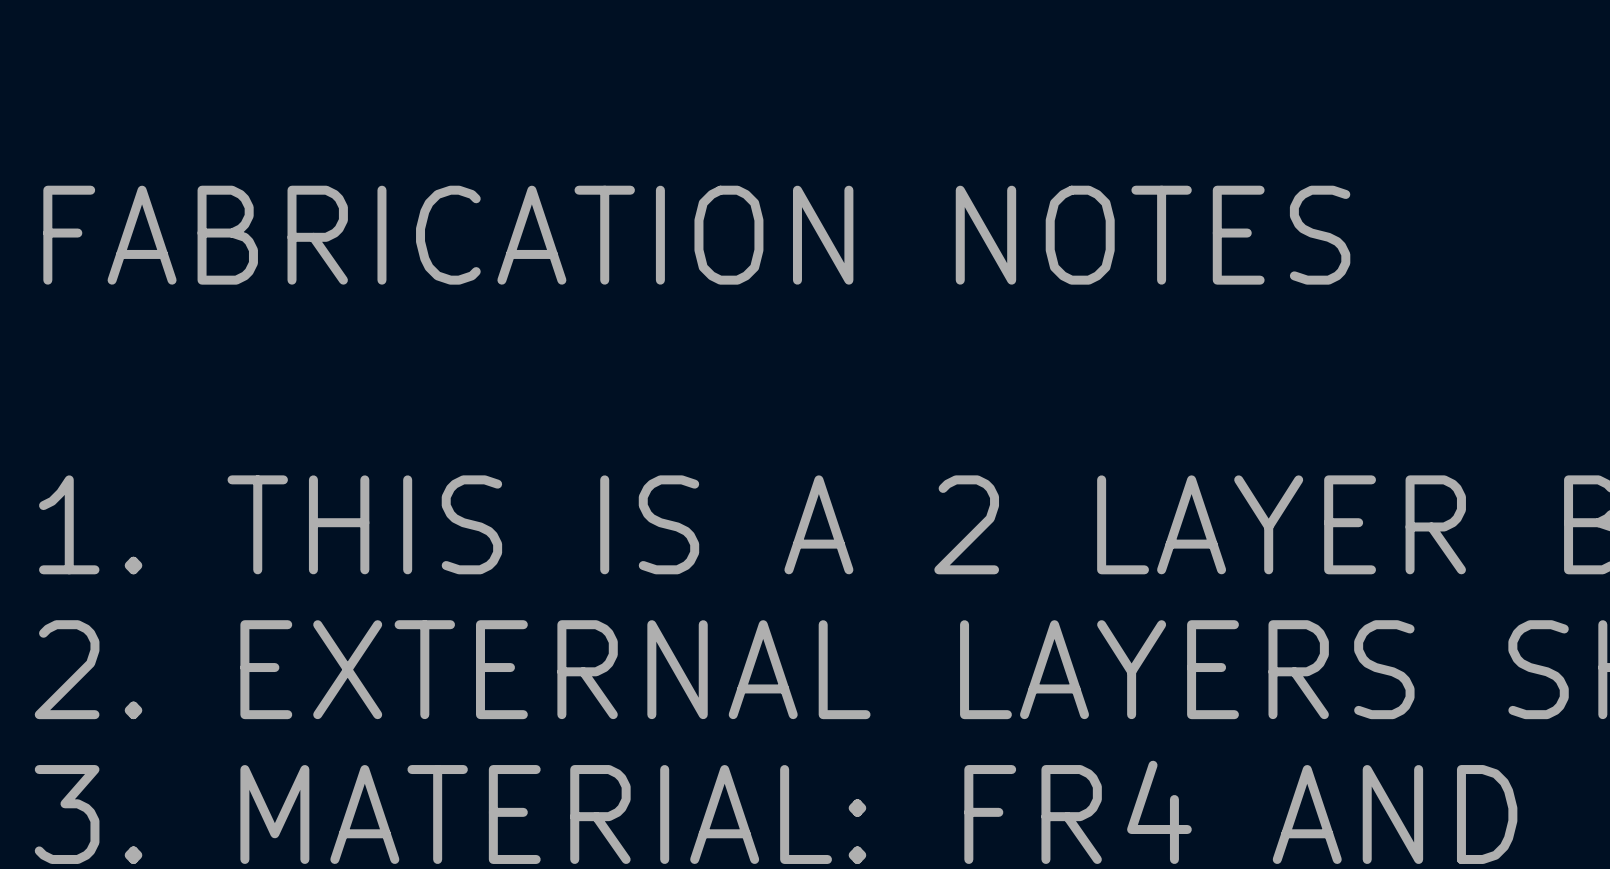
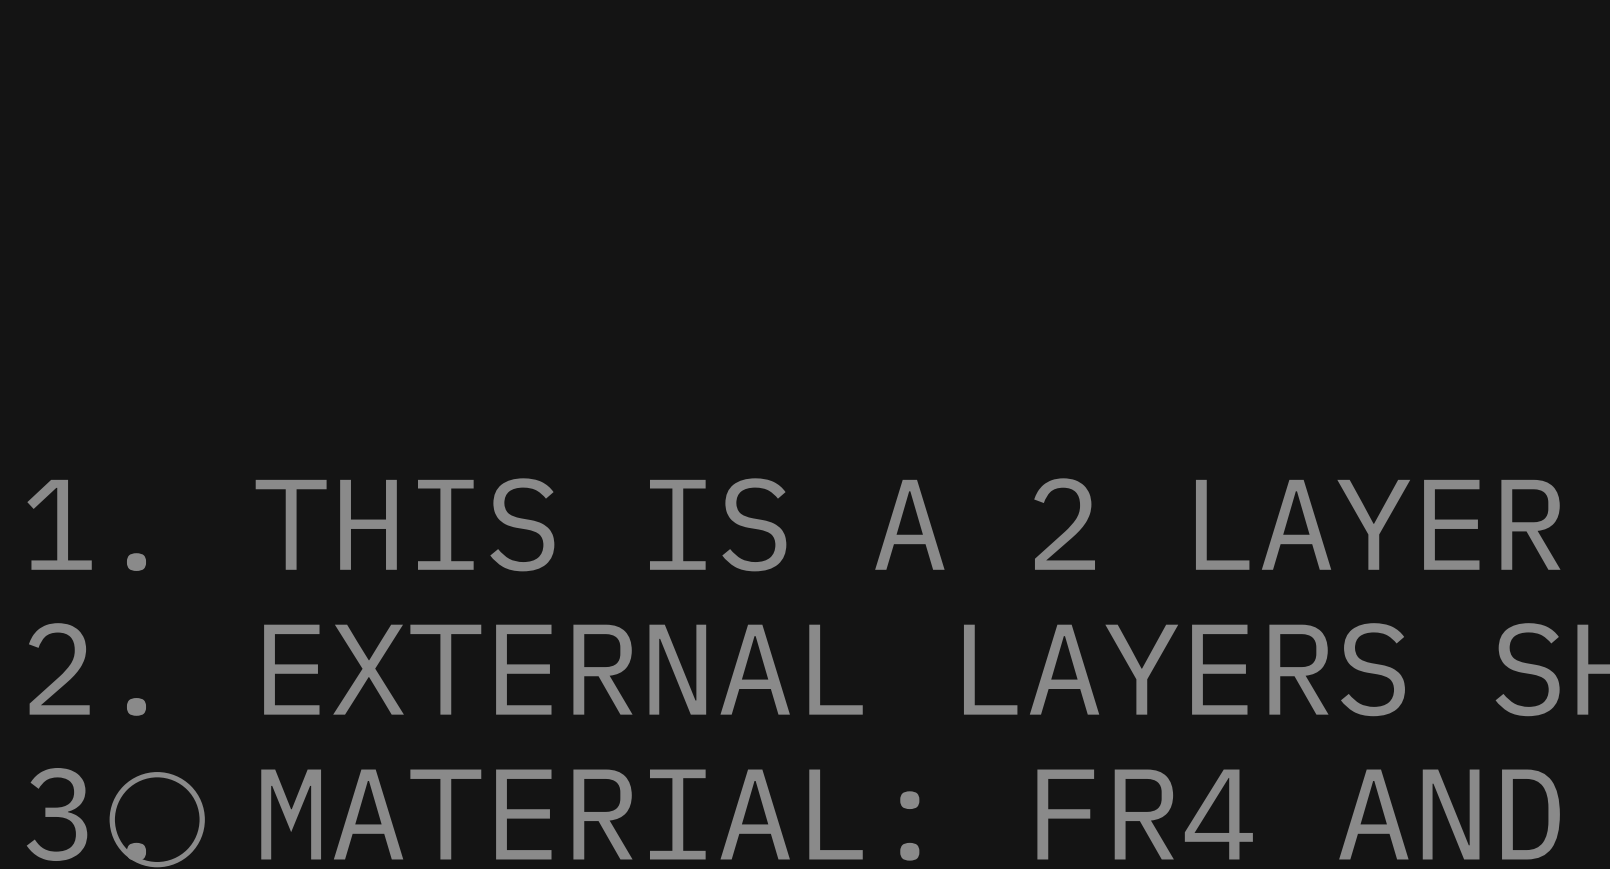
text: FABRICATION NOTES (696, 235) -> none
drawing: none -> [109, 772, 205, 868]

